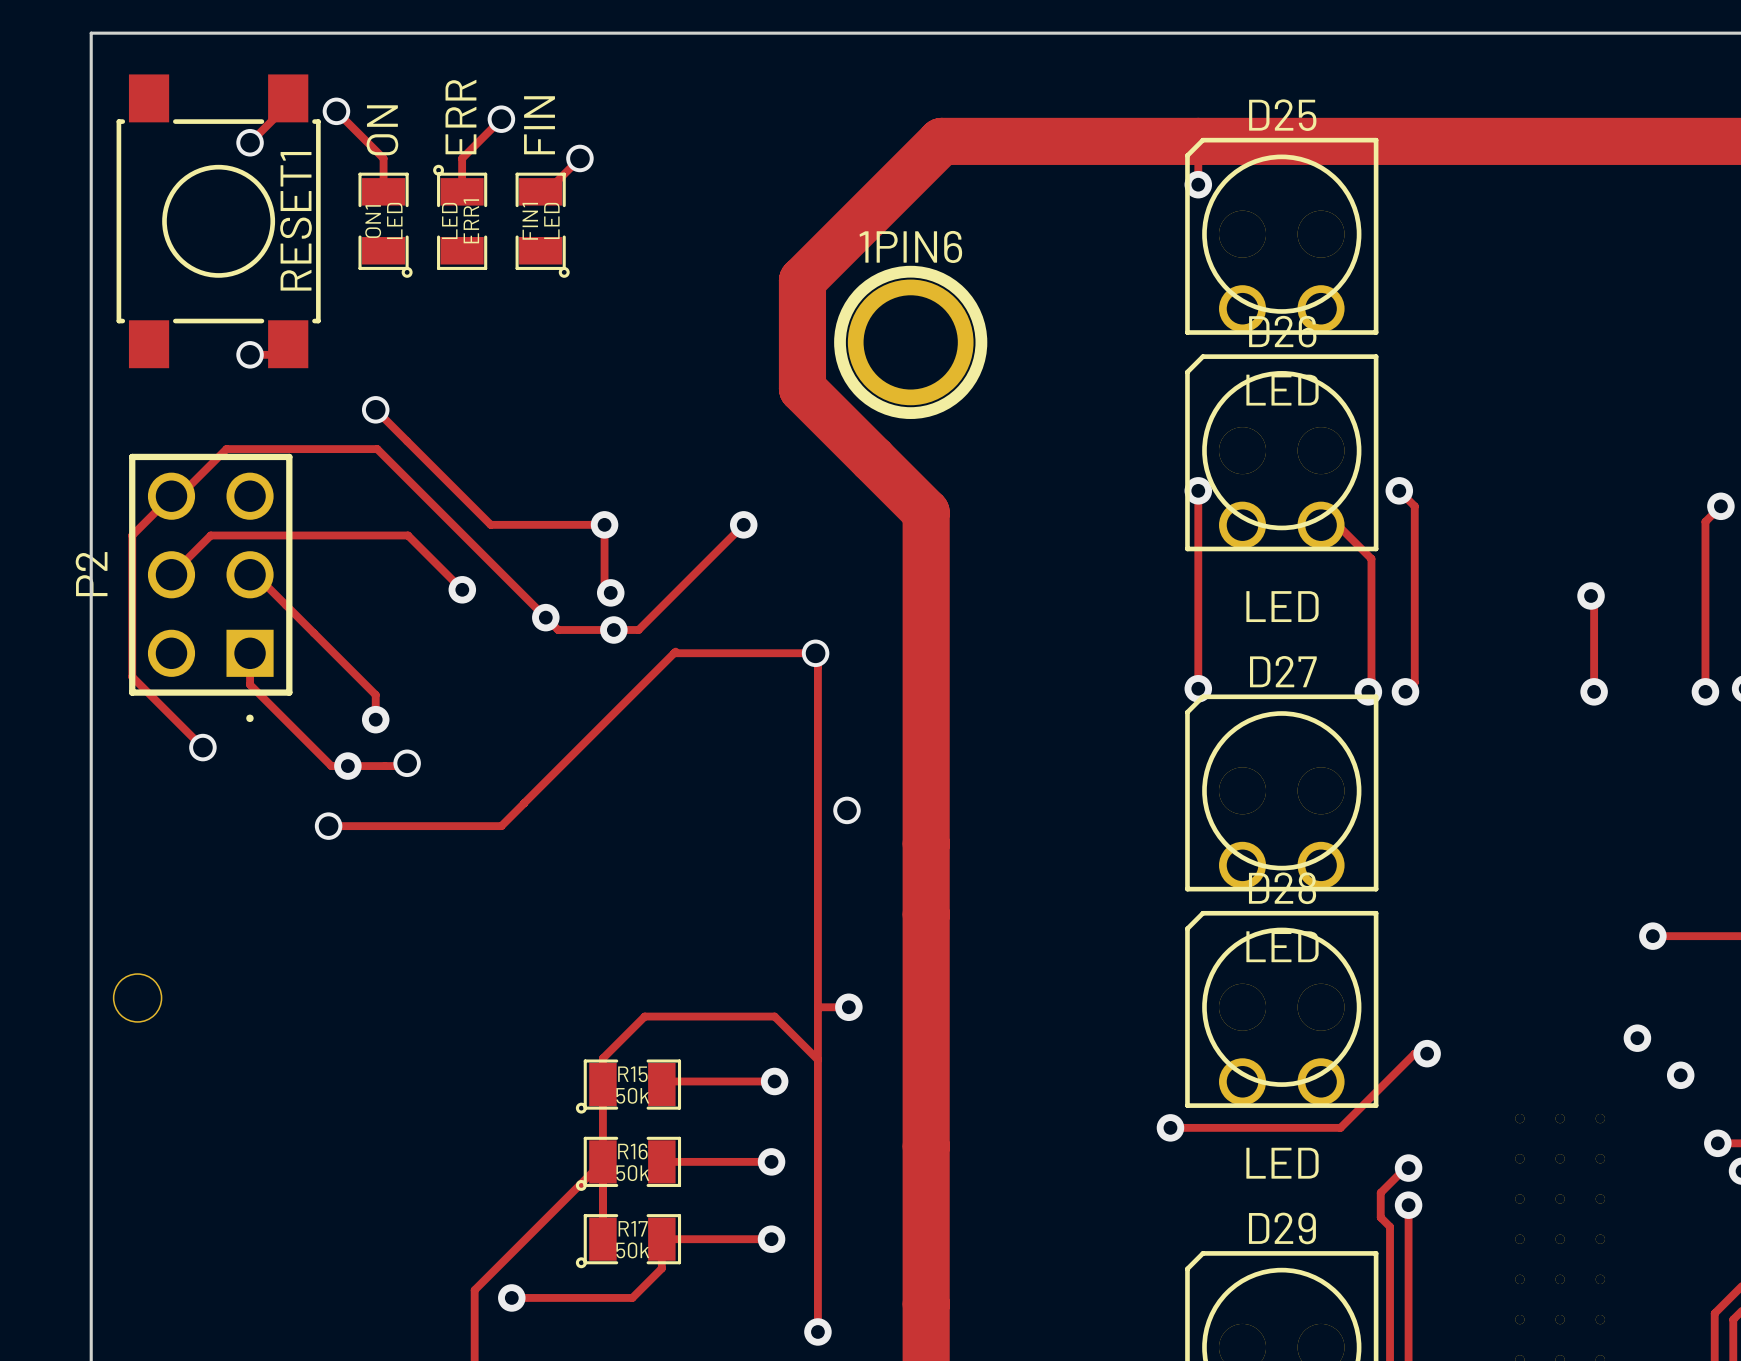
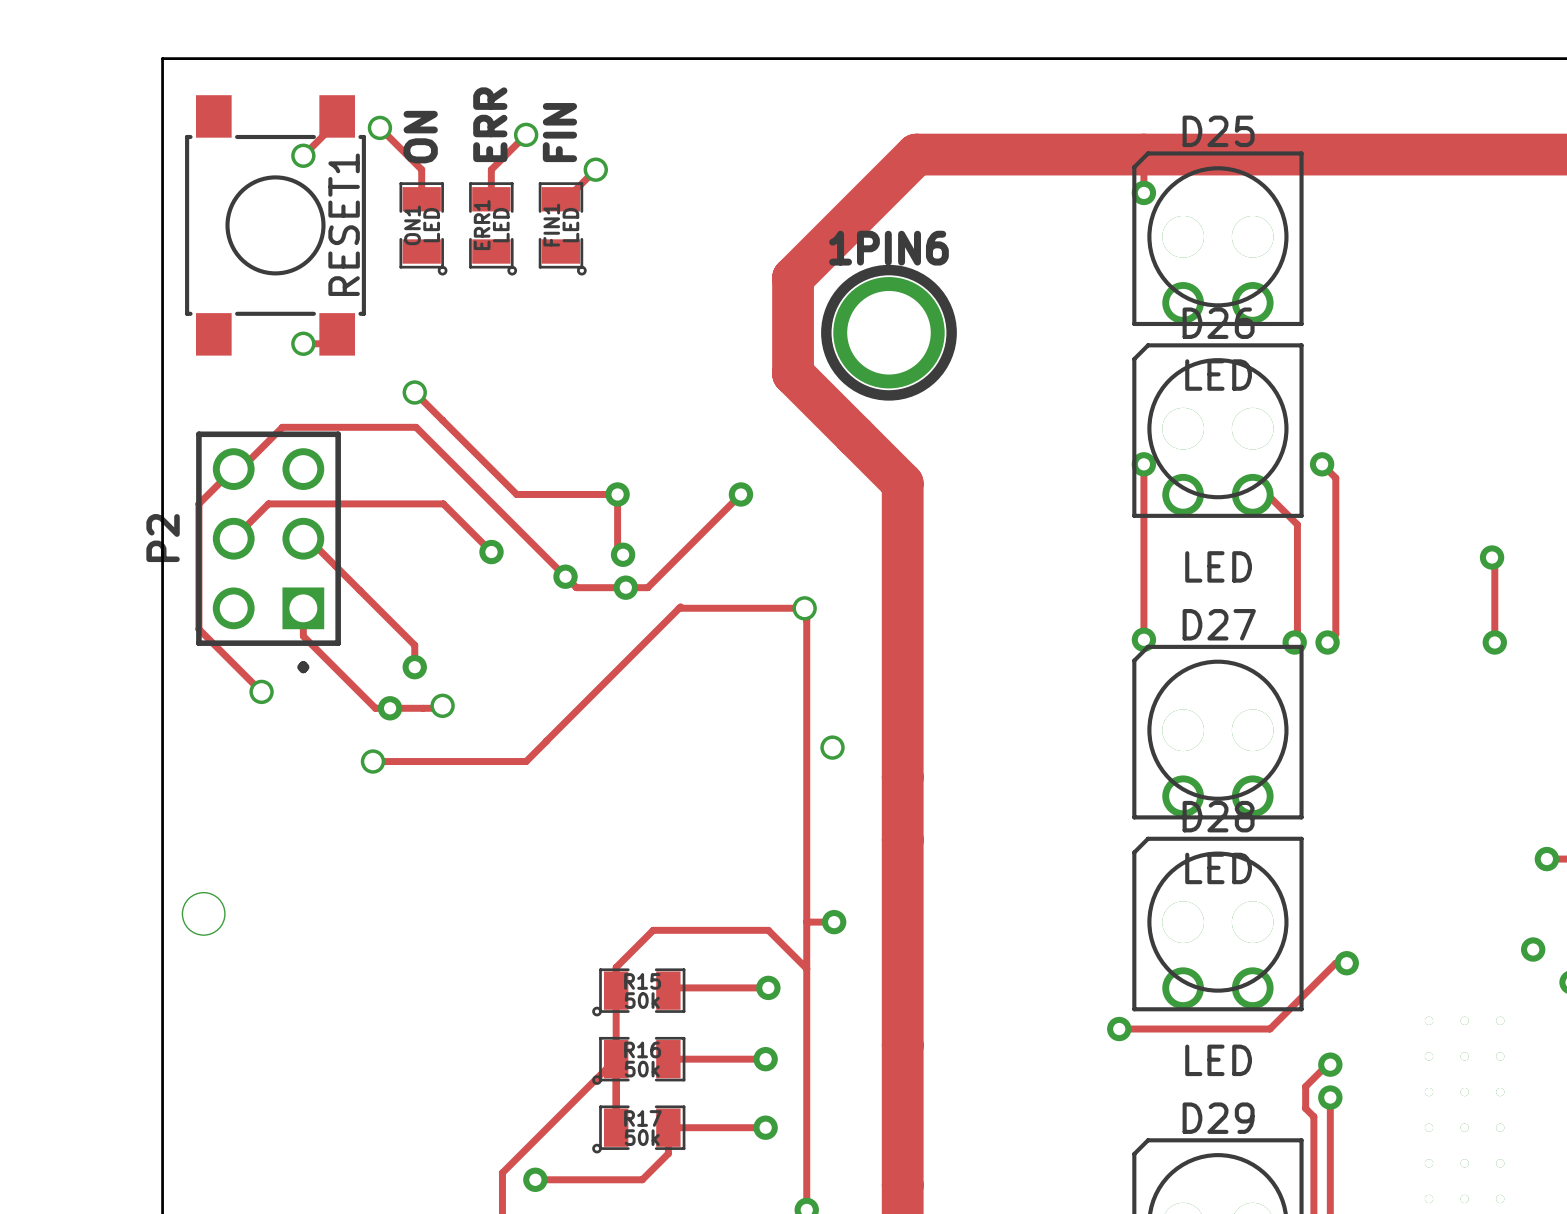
ERR1 rotation: 0° (460, 217) -> 180° (493, 228)

